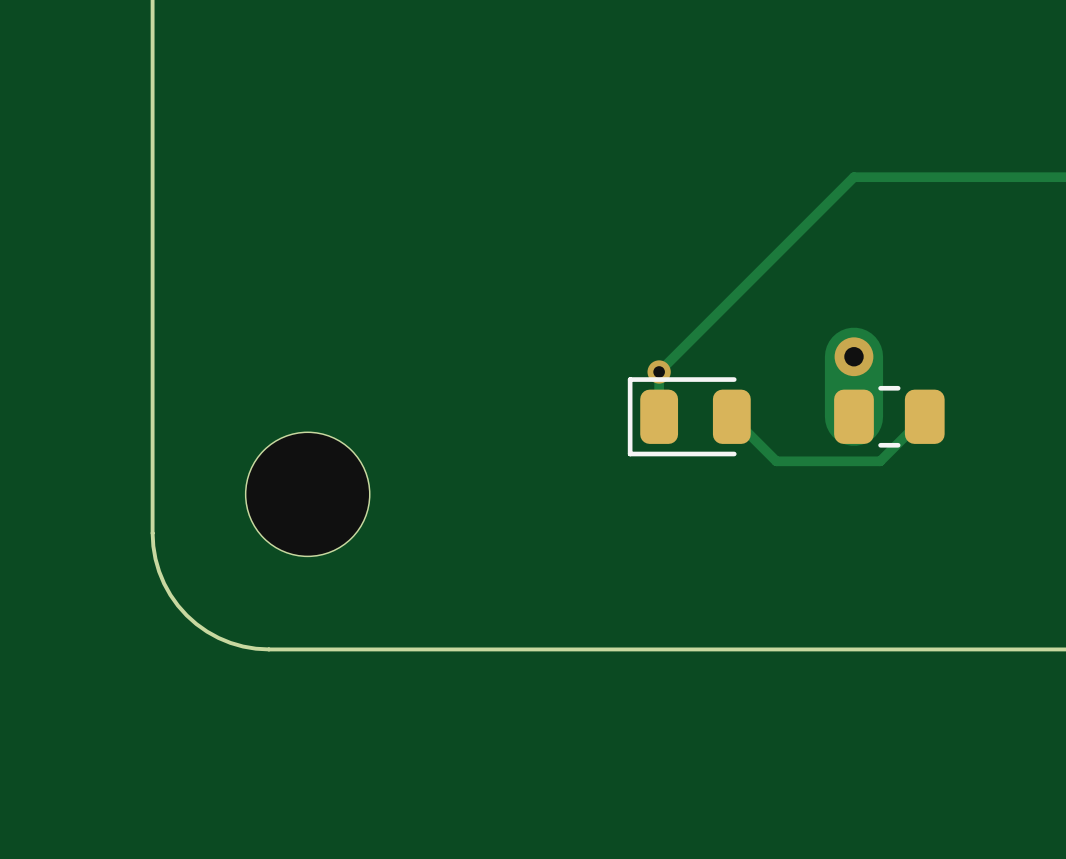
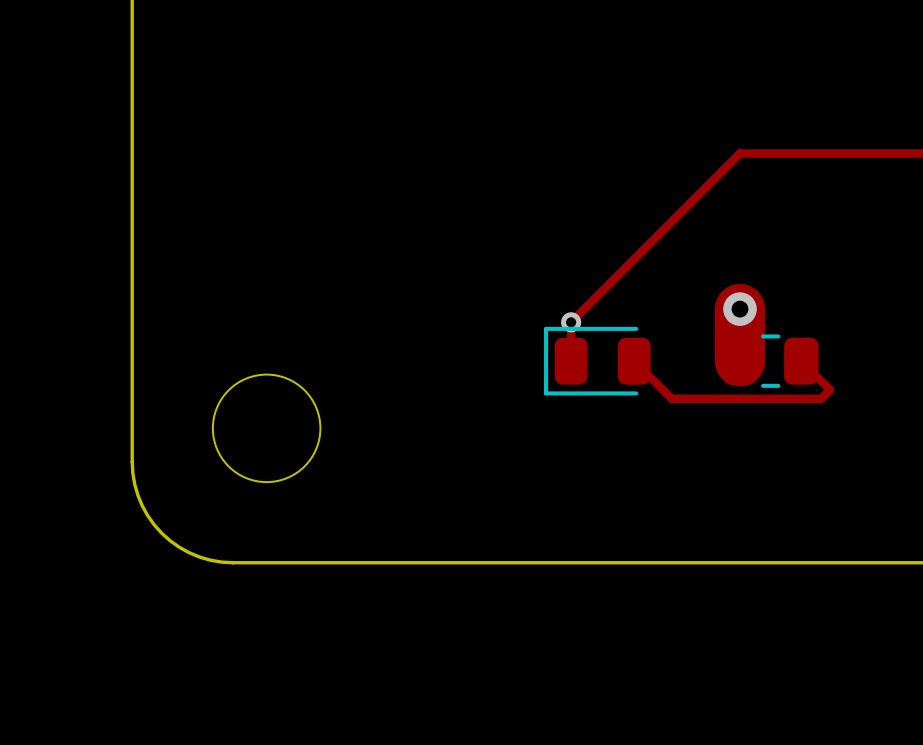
track: (924, 416) (880, 461) (775, 460) -> (801, 361) (830, 389) (821, 398) (671, 398)

